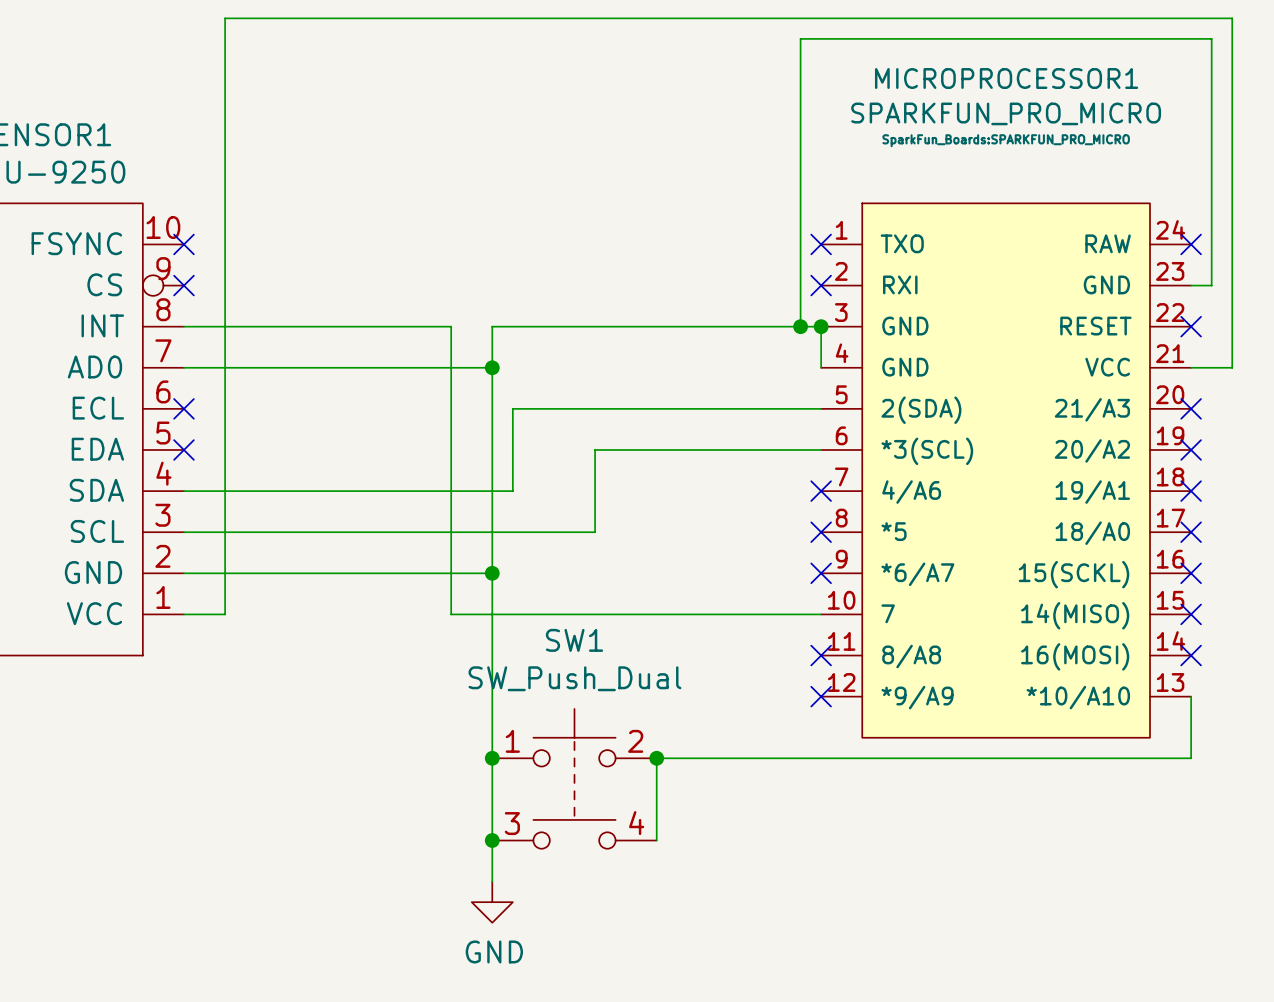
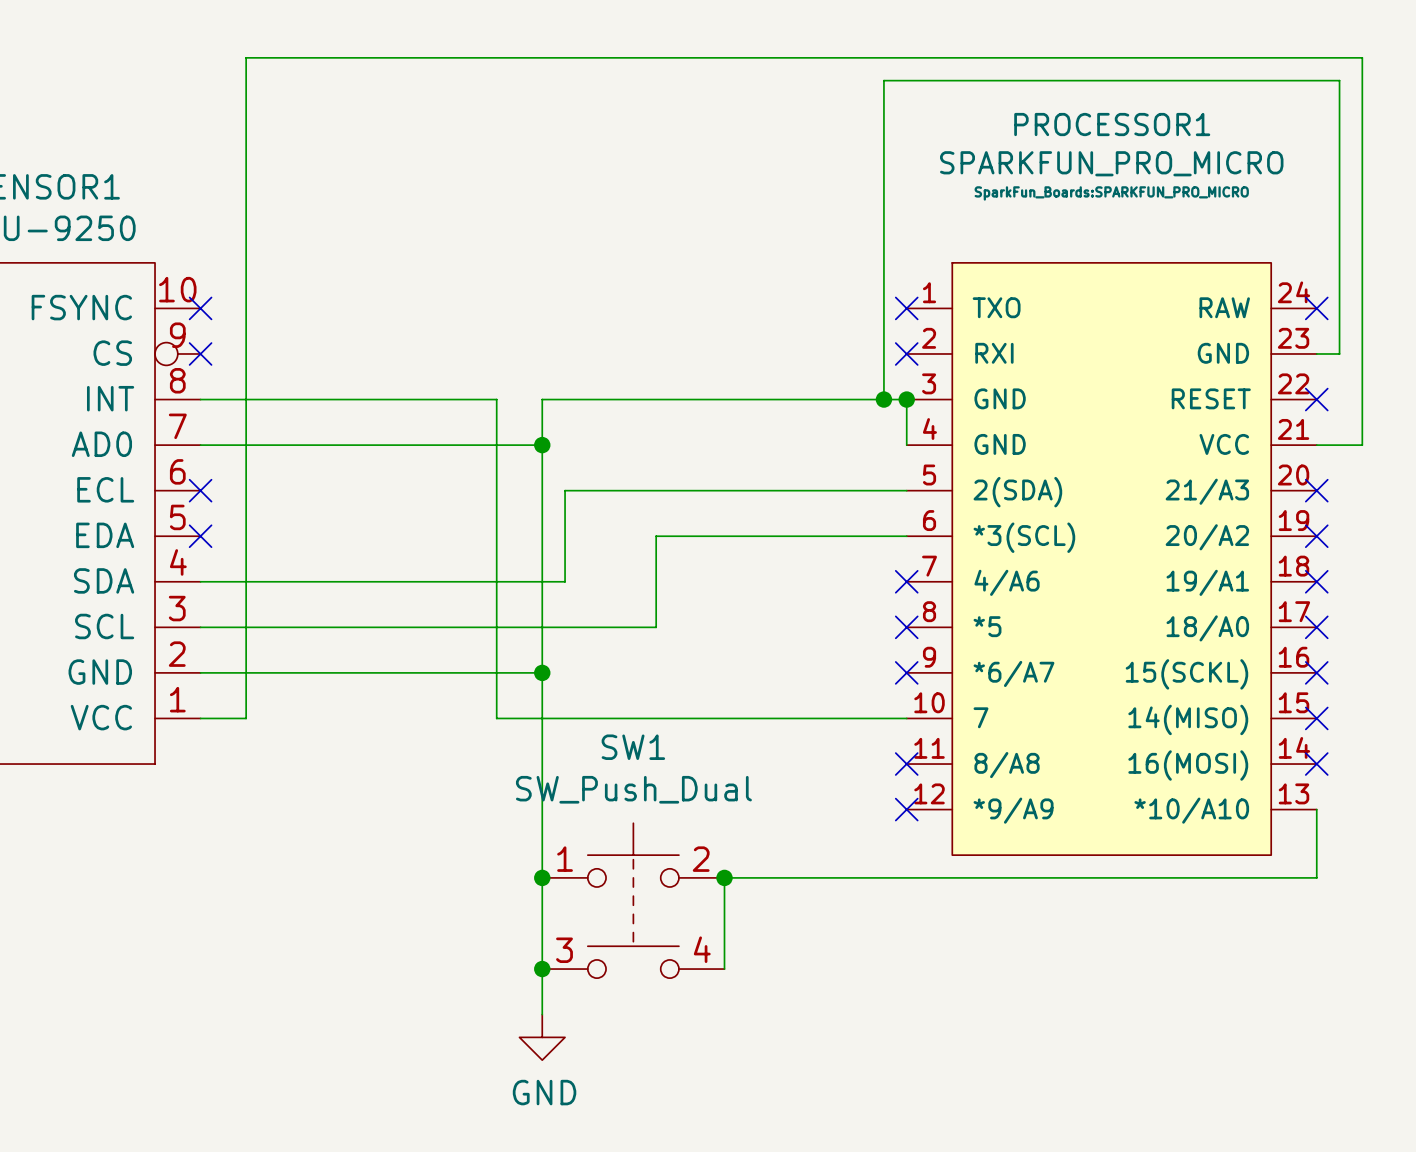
MICROPROCESSOR1 name: MICROPROCESSOR1 (1006, 78) -> PROCESSOR1 (1112, 124)

